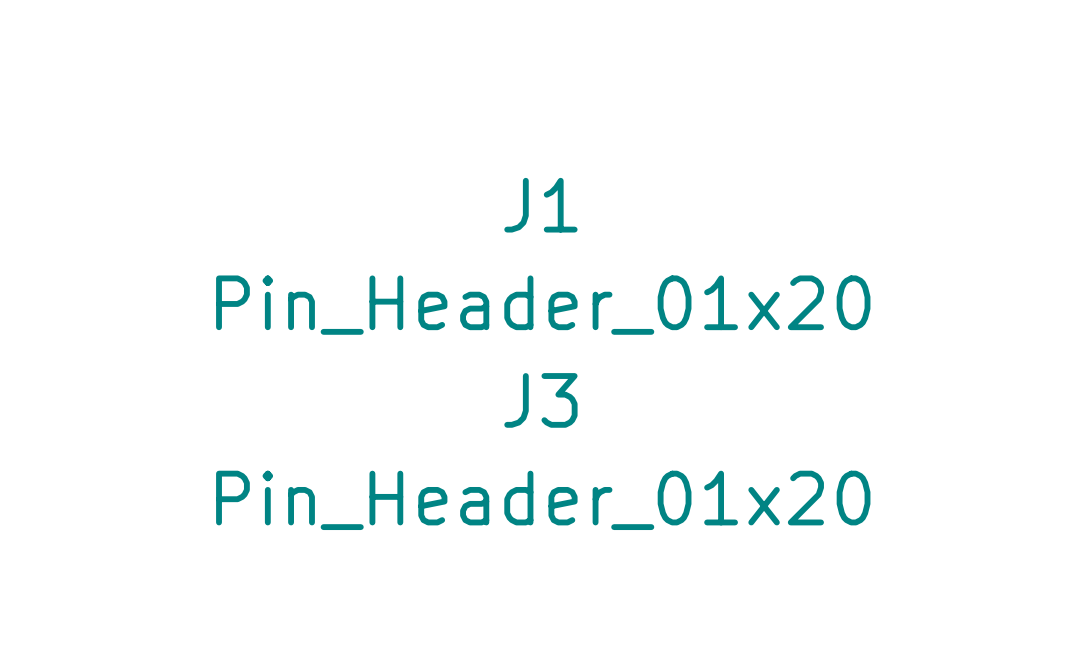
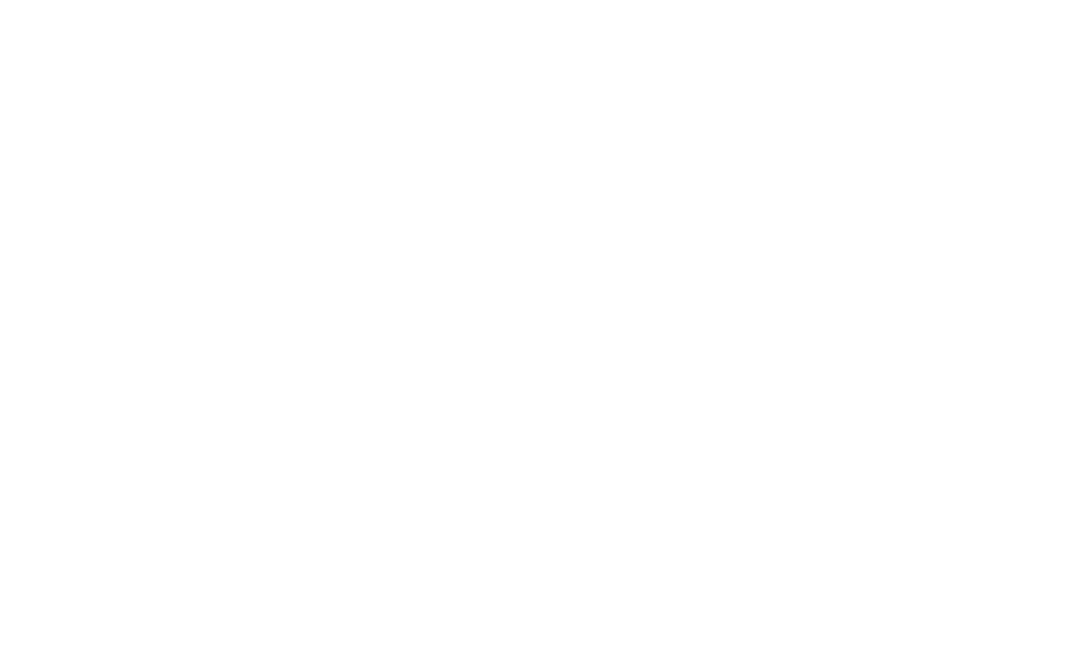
J1: Pin_Header_01x20 (543, 256) -> none
J3: Pin_Header_01x20 (543, 451) -> none

